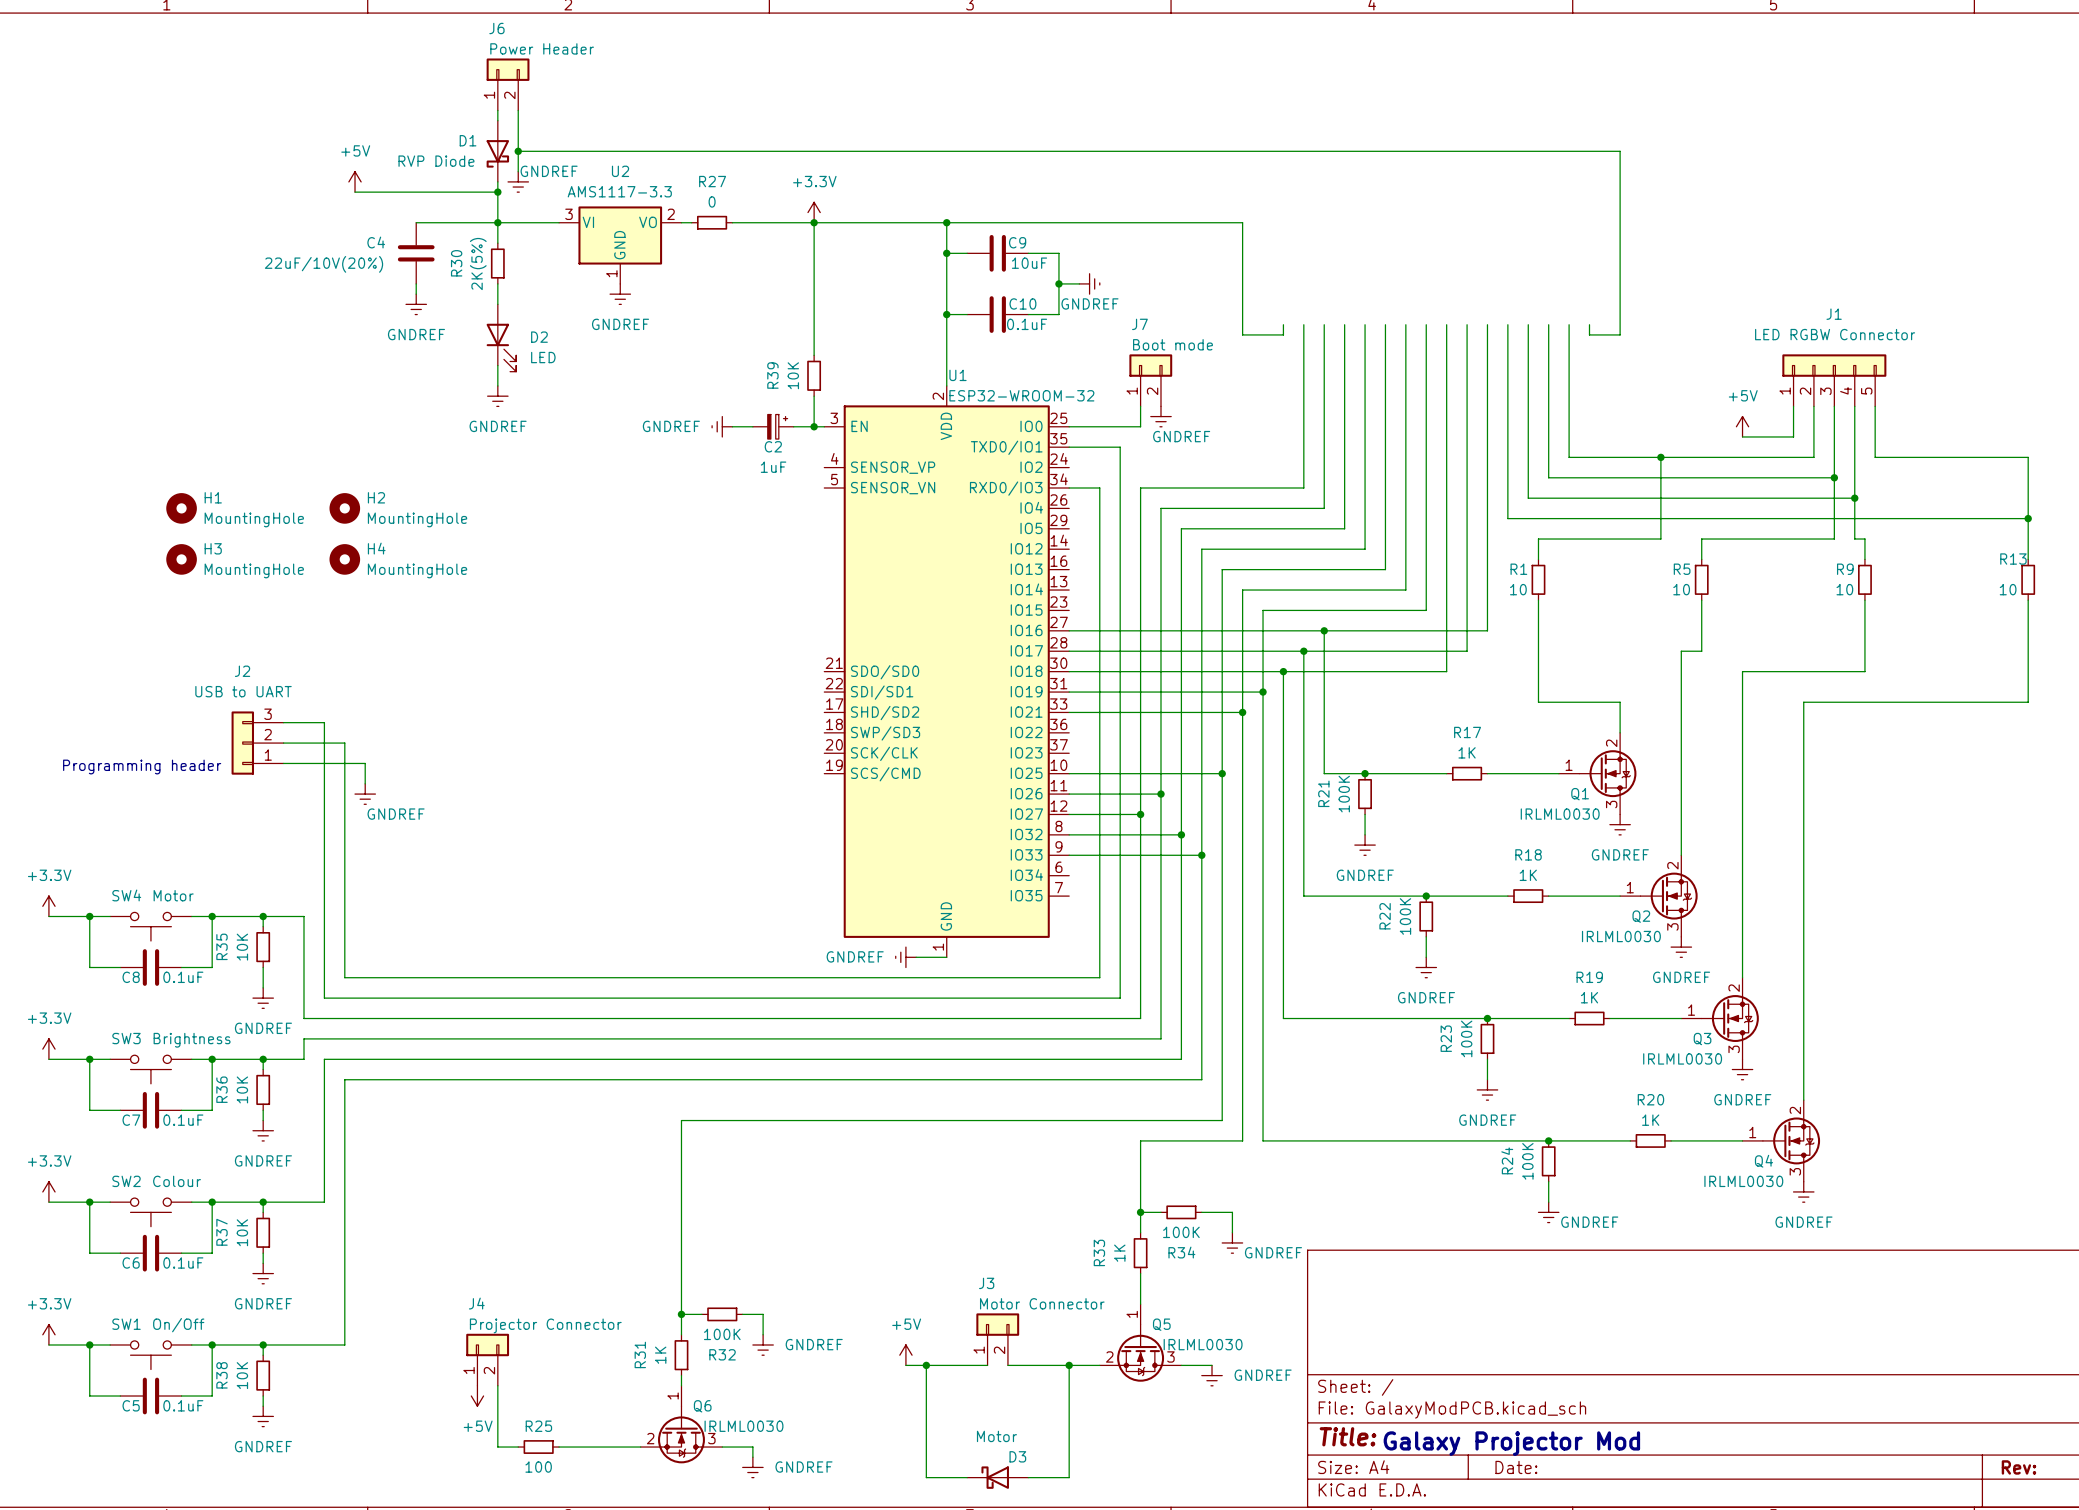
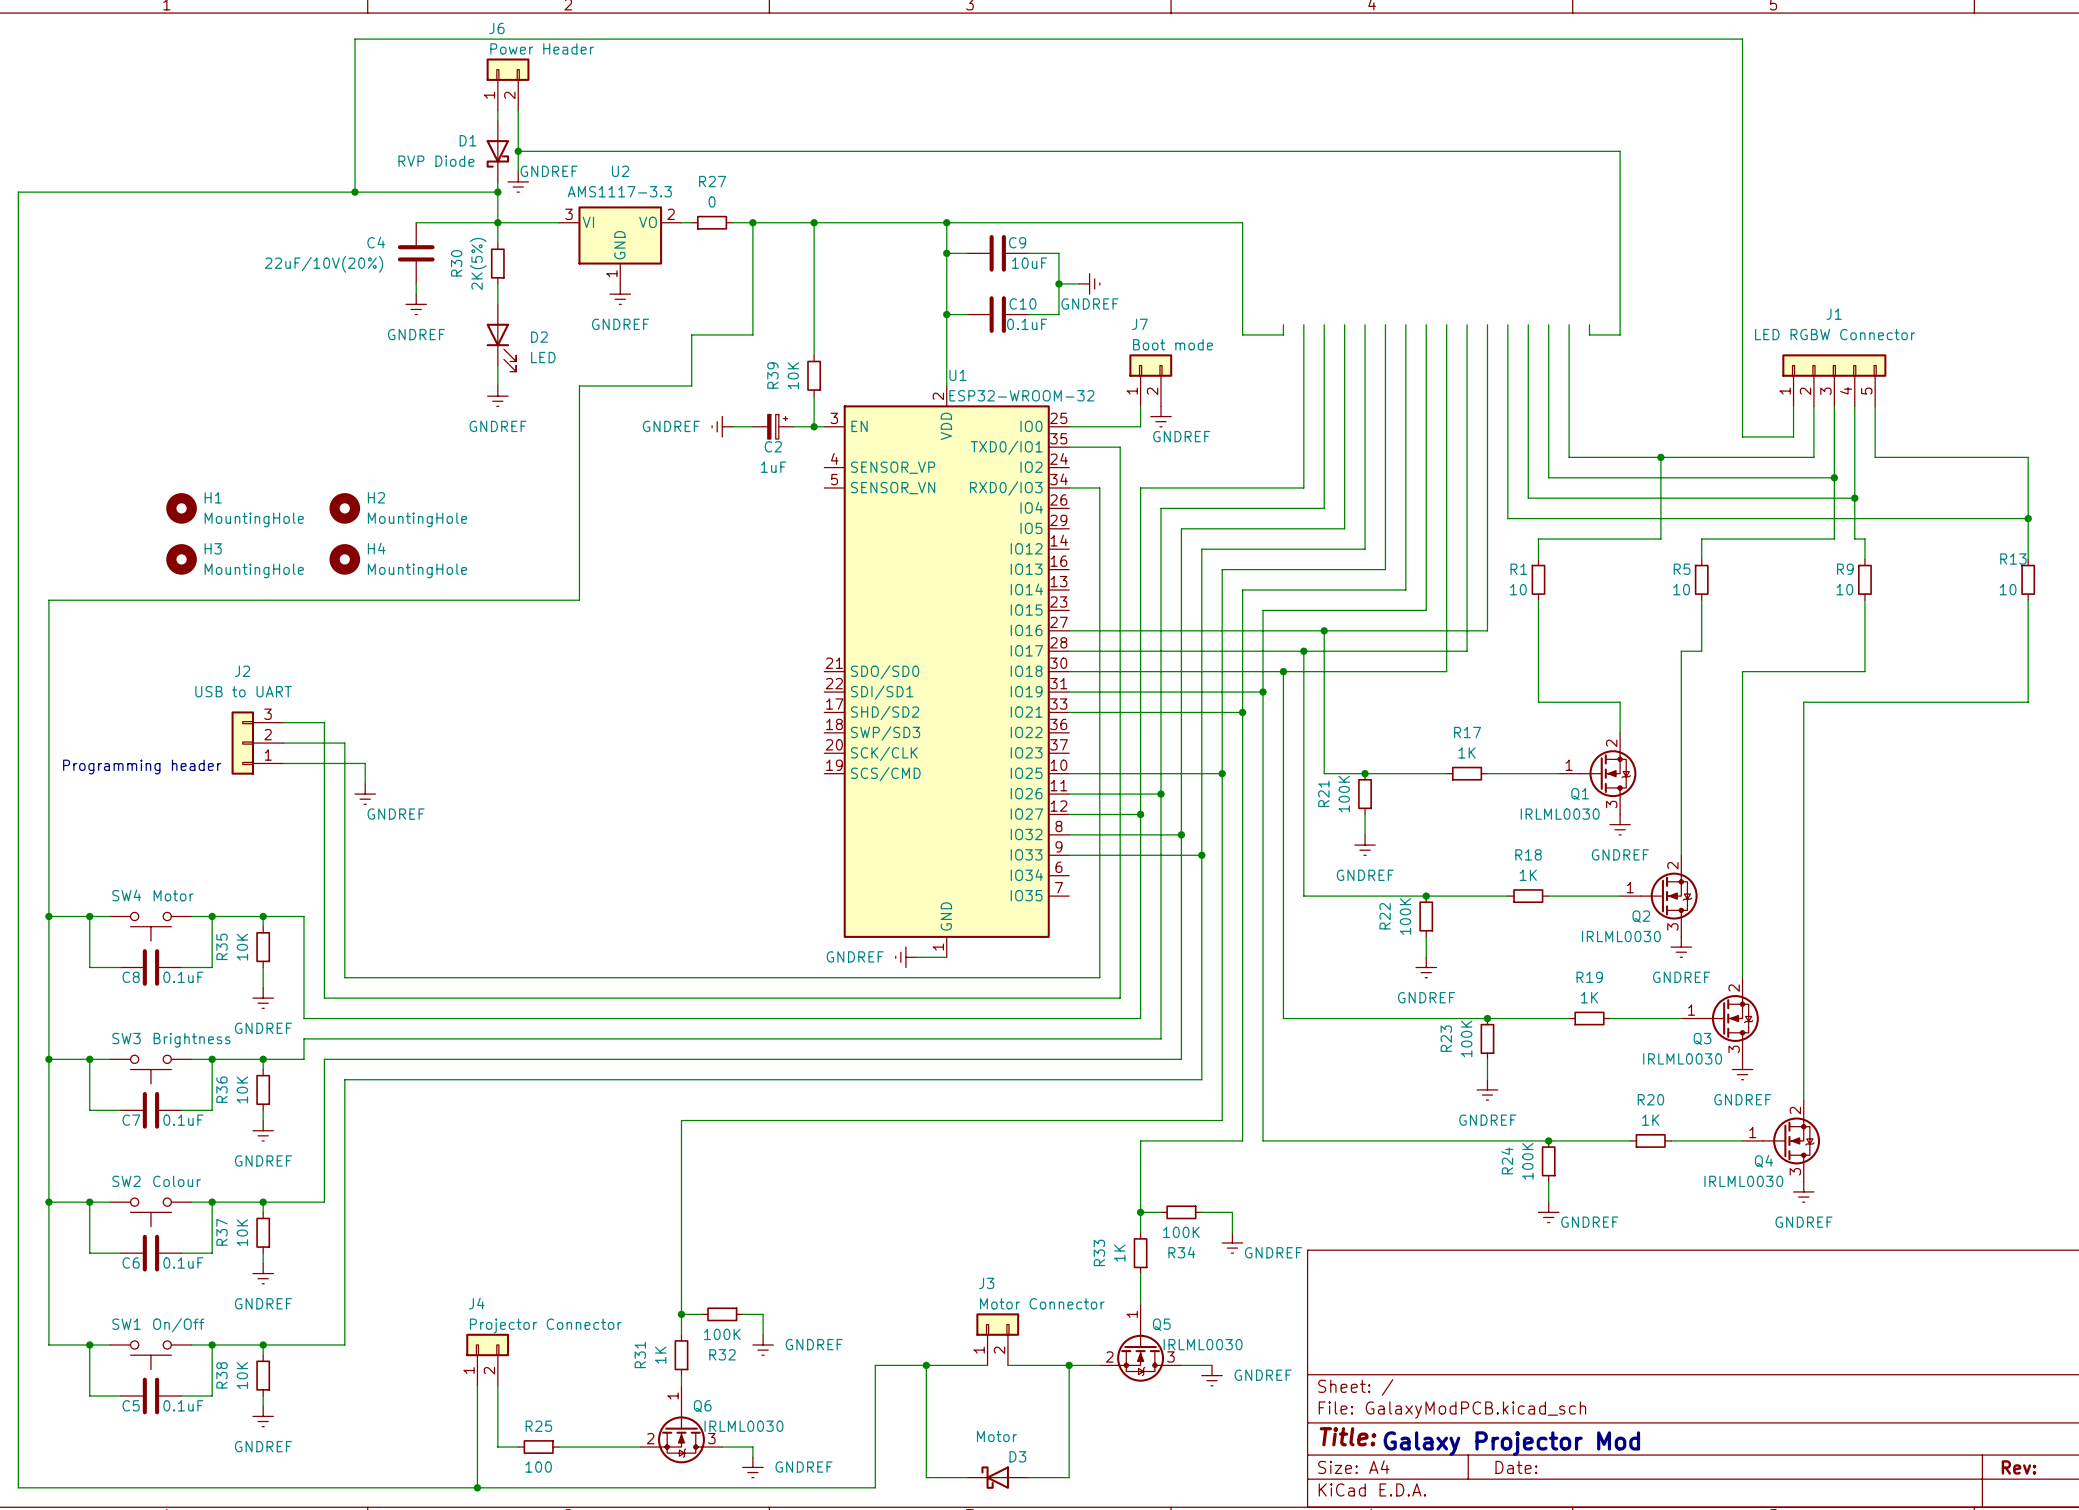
power symbol: +5V (355, 181) -> none
junction: none -> (355, 192)
power symbol: +3.3V (814, 212) -> none
wire: none -> (752, 222) (752, 334) (691, 334) (691, 385) (579, 385) (579, 600) (48, 600) (48, 1344)
junction: none -> (752, 222)
power symbol: +5V (1742, 426) -> none
wire: none -> (1742, 436) (1742, 39) (355, 39) (355, 192) (18, 192) (18, 1487) (875, 1487) (875, 1365) (905, 1365)
power symbol: +3.3V (48, 906) -> none
junction: none -> (48, 916)
power symbol: +3.3V (48, 1049) -> none
junction: none -> (48, 1059)
power symbol: +3.3V (48, 1191) -> none
junction: none -> (48, 1202)
power symbol: +3.3V (48, 1334) -> none
power symbol: +5V (905, 1355) -> none
wire: none -> (477, 1385) (477, 1487)
power symbol: +5V (477, 1396) -> none
junction: none -> (477, 1487)

